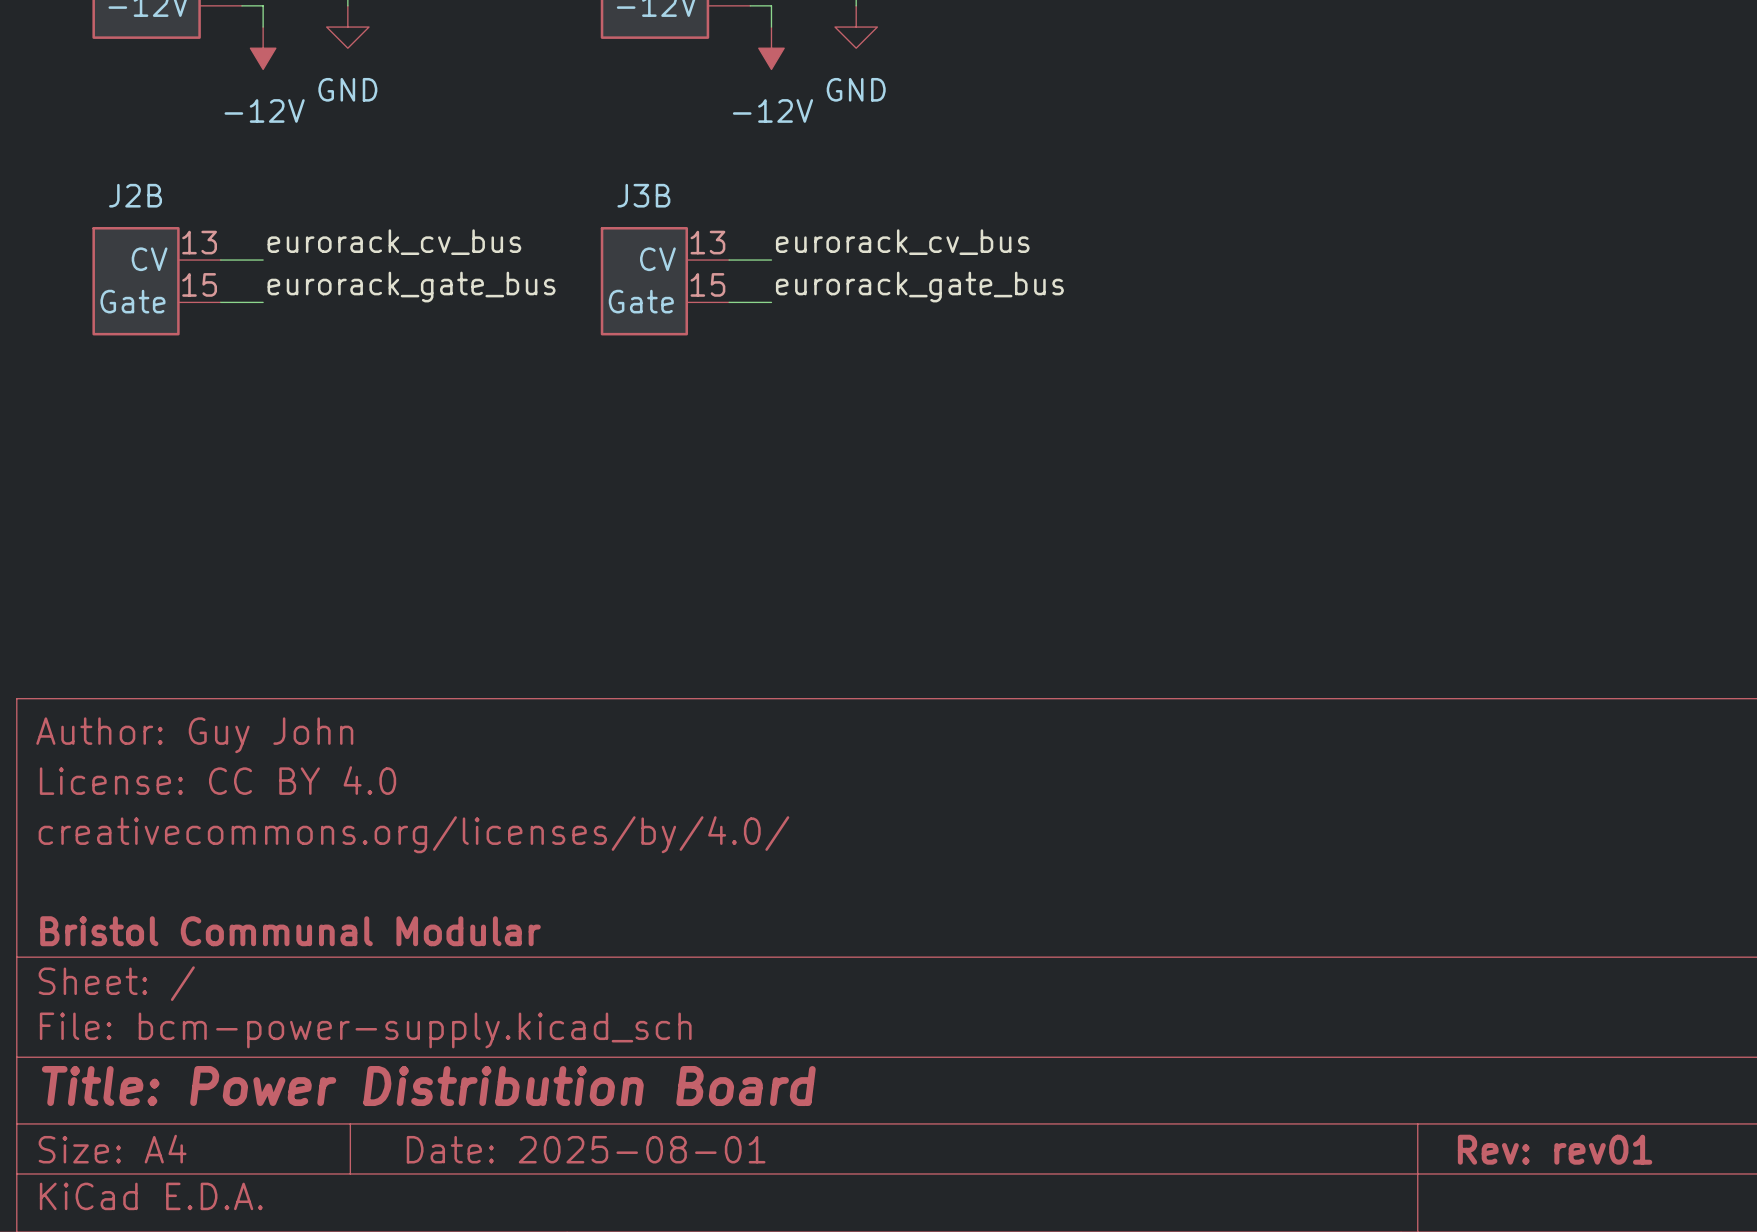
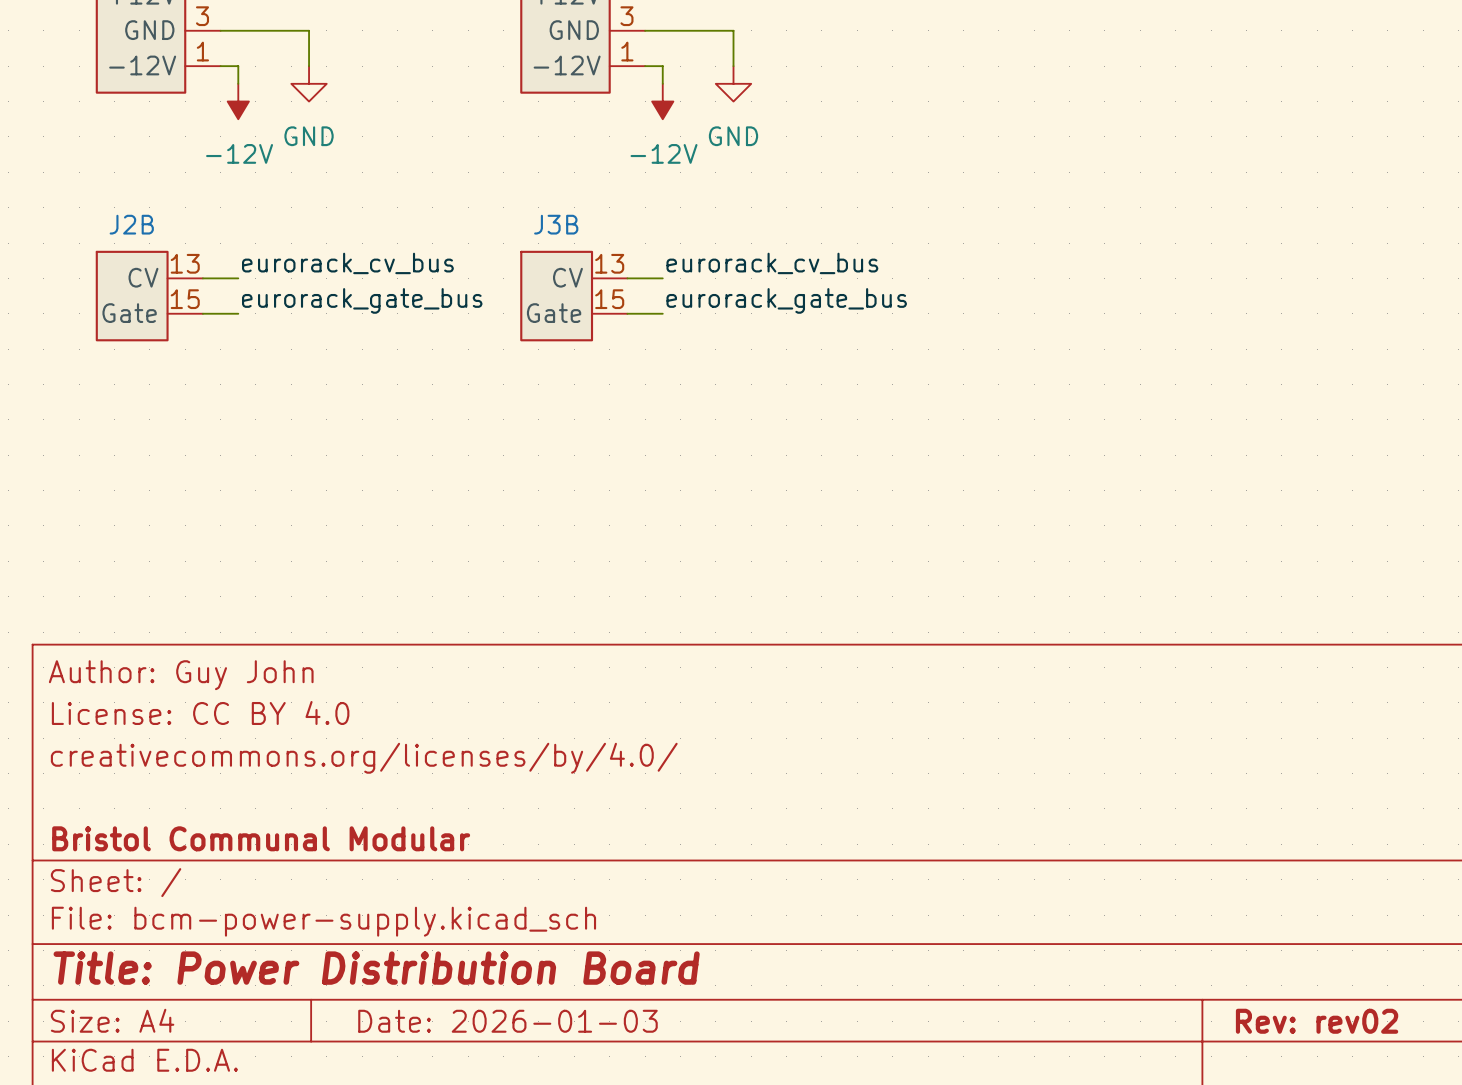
title block: Date: 2025-08-01 (586, 1149) -> Date: 2026-01-03 (507, 1021)
title block: Rev: rev01 (1555, 1149) -> Rev: rev02 (1317, 1021)

